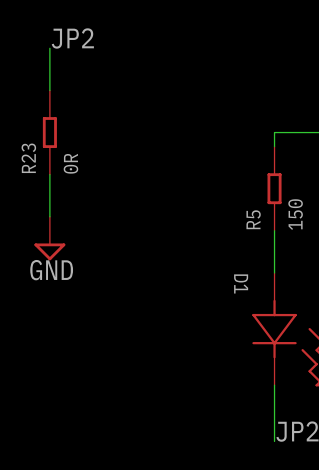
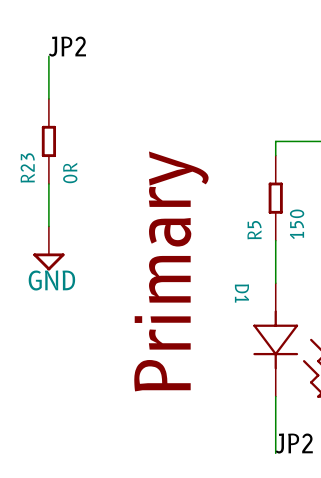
text: none -> Primary (171, 271)

